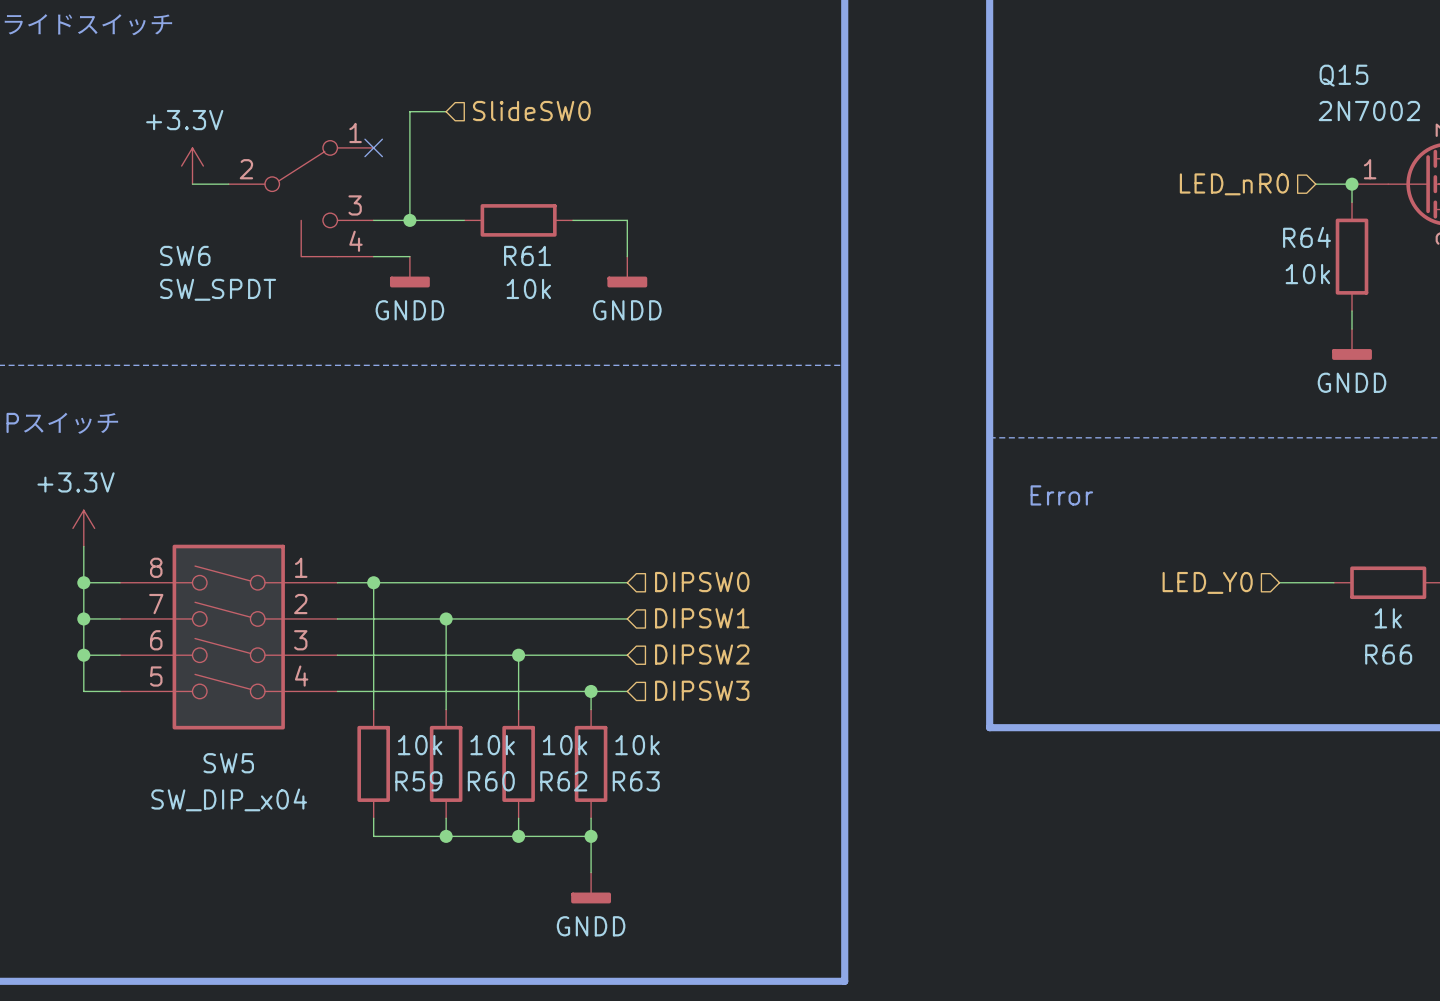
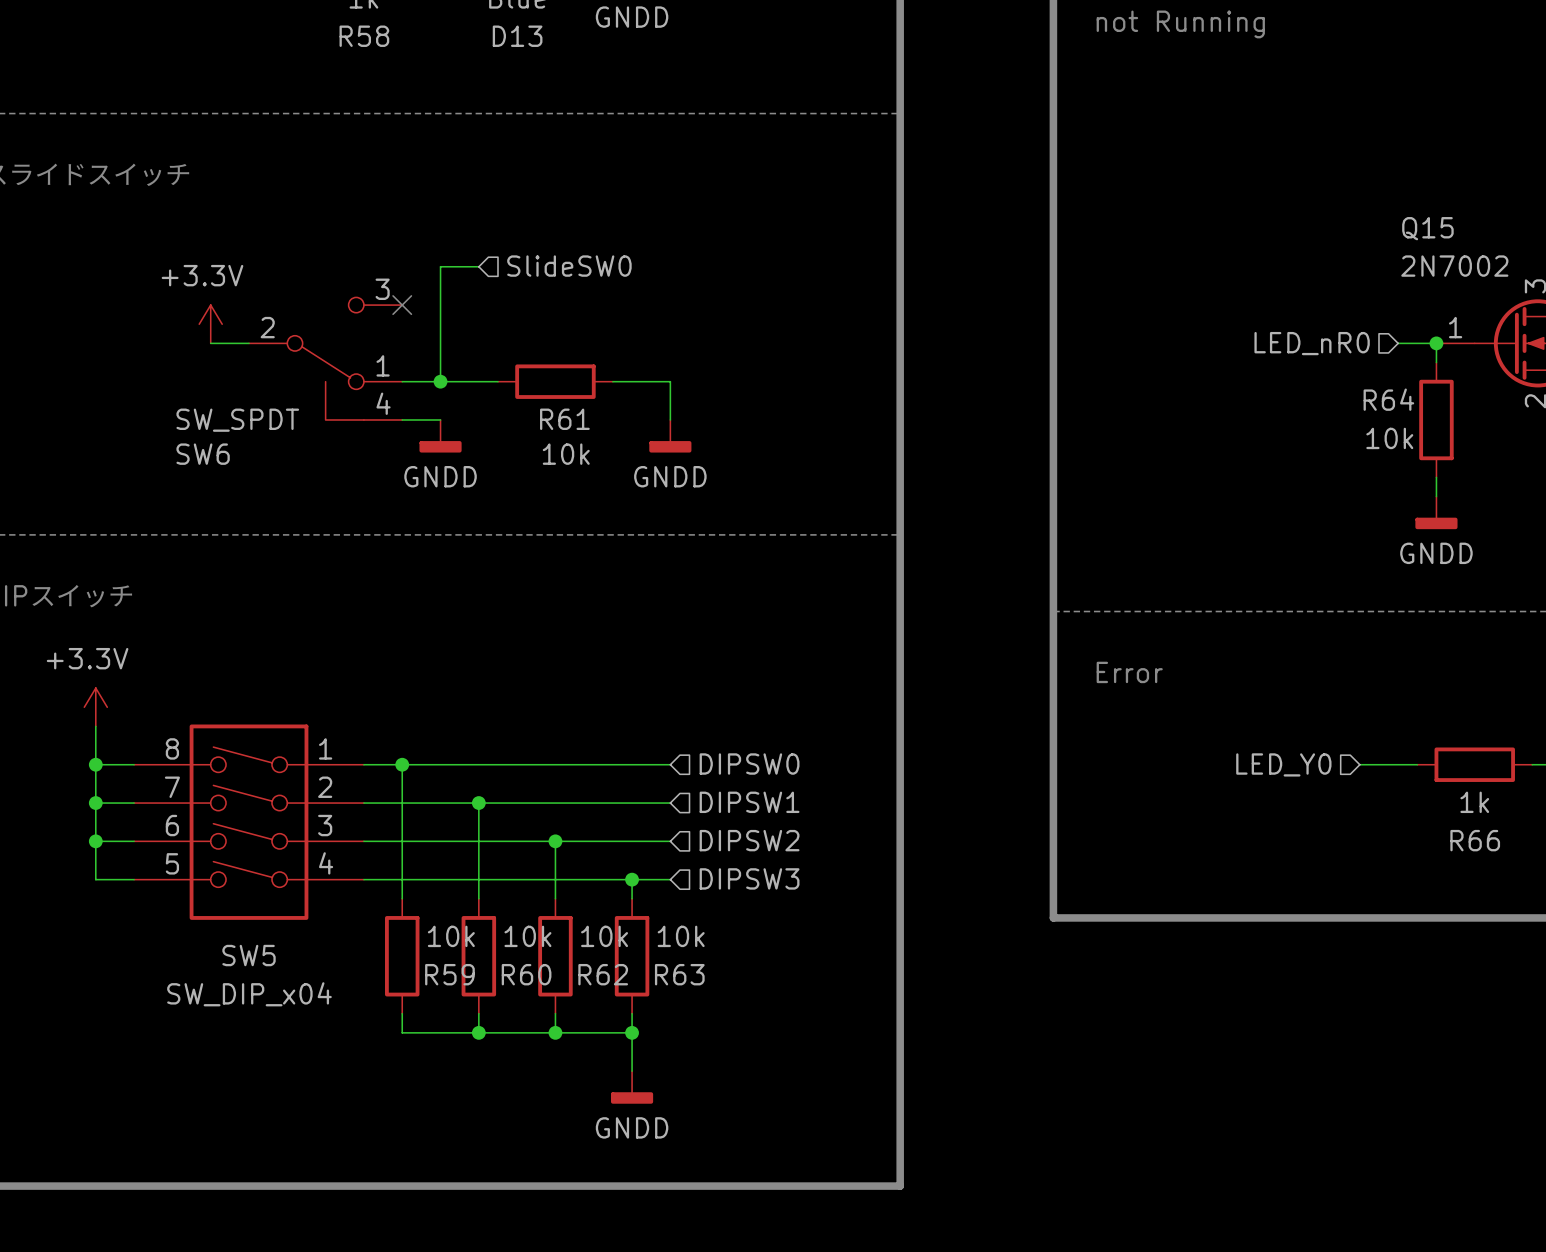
SW6 symbol: [228, 140, 374, 257] -> [249, 297, 403, 420]
SW6 name position: SW6 (185, 255) -> SW6 (203, 454)
SW6 value position: SW_SPDT (218, 289) -> SW_SPDT (237, 420)

